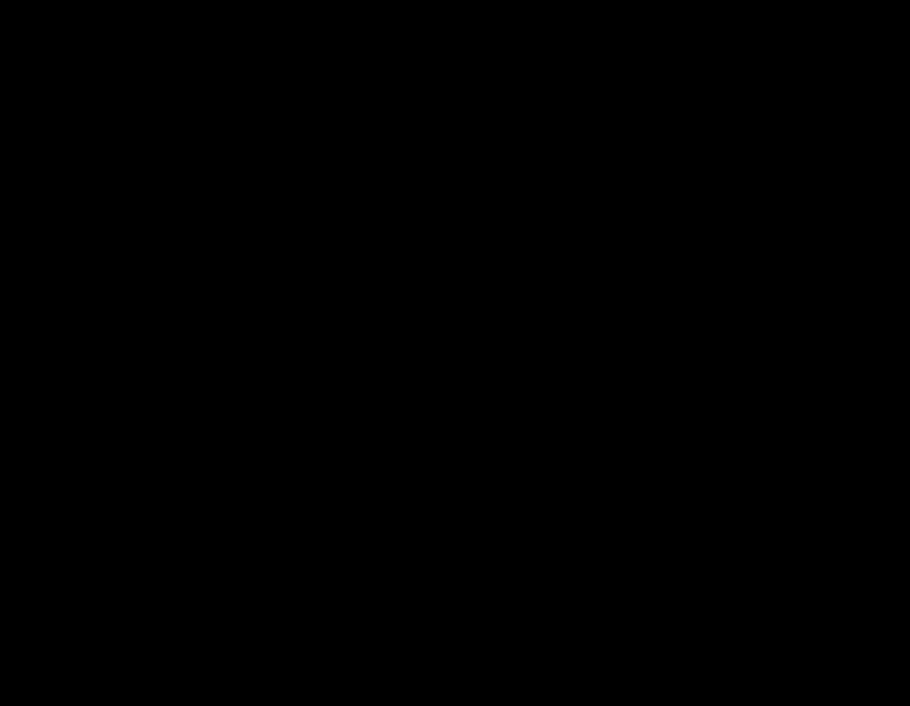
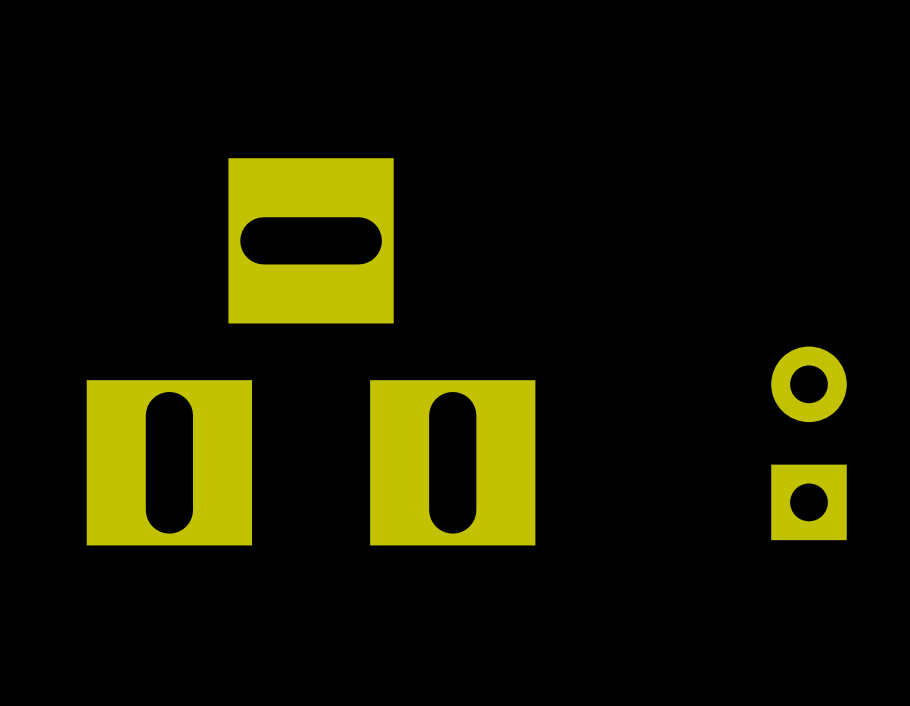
part: none -> (311, 351)
part: none -> (808, 443)

